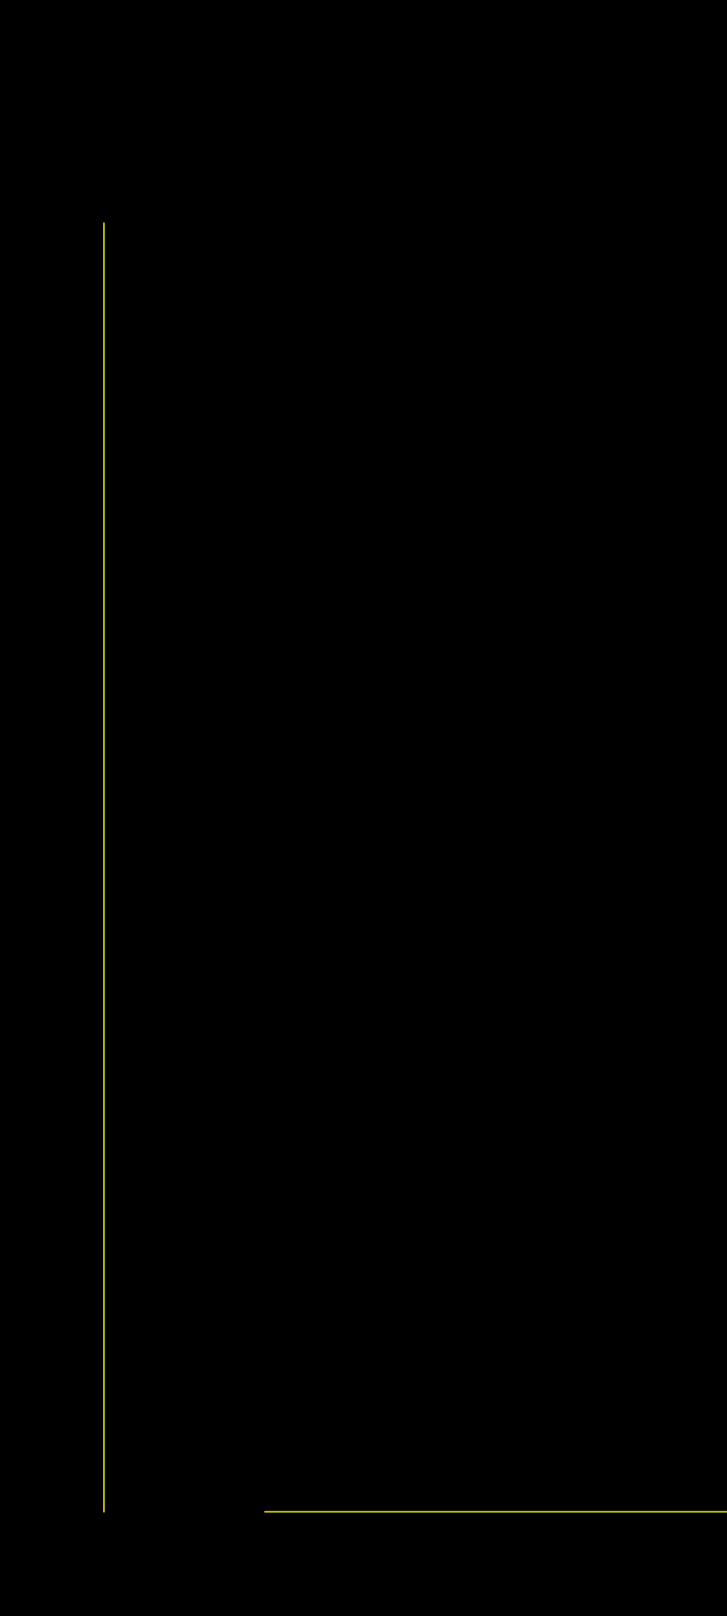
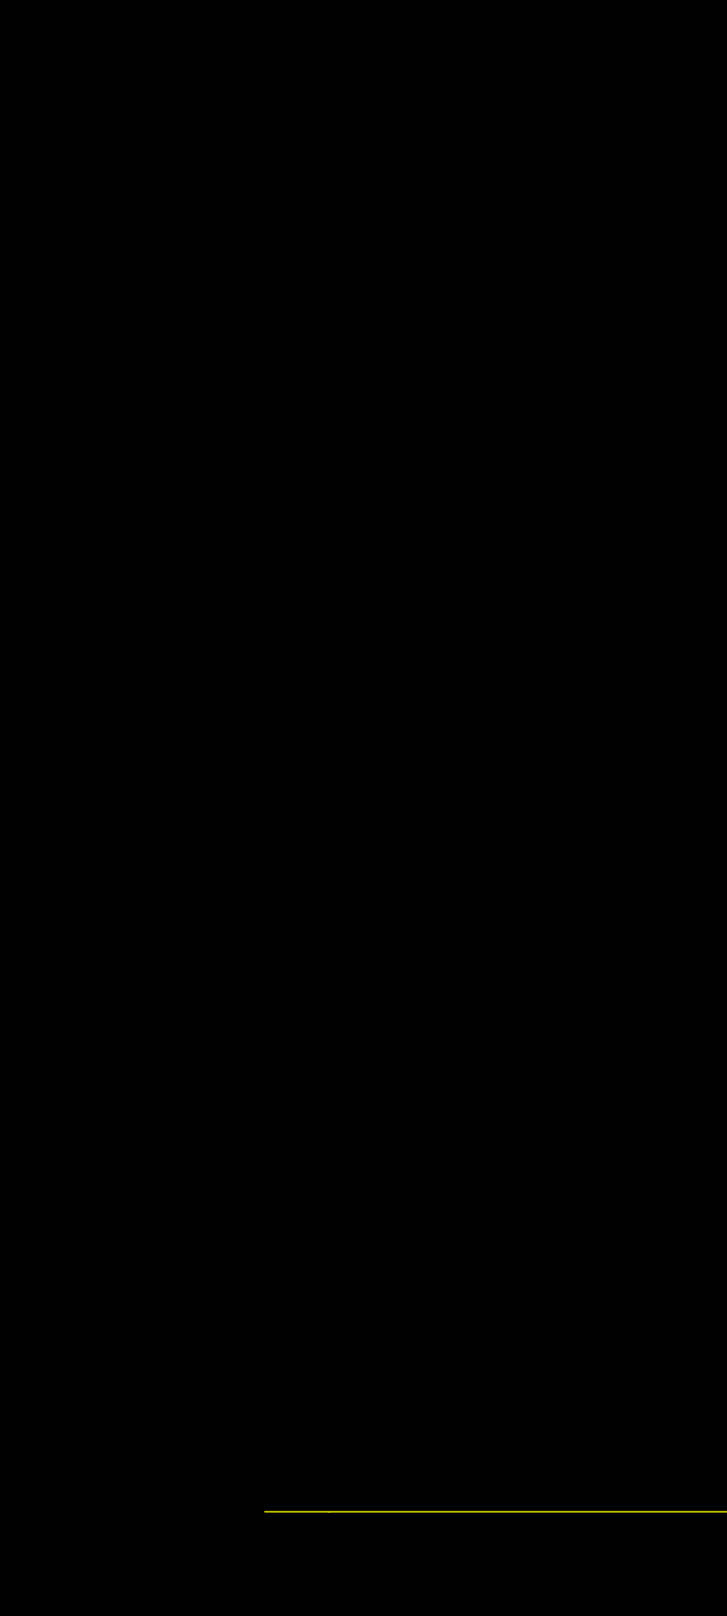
board edge: (103, 223) (103, 1511) -> none

